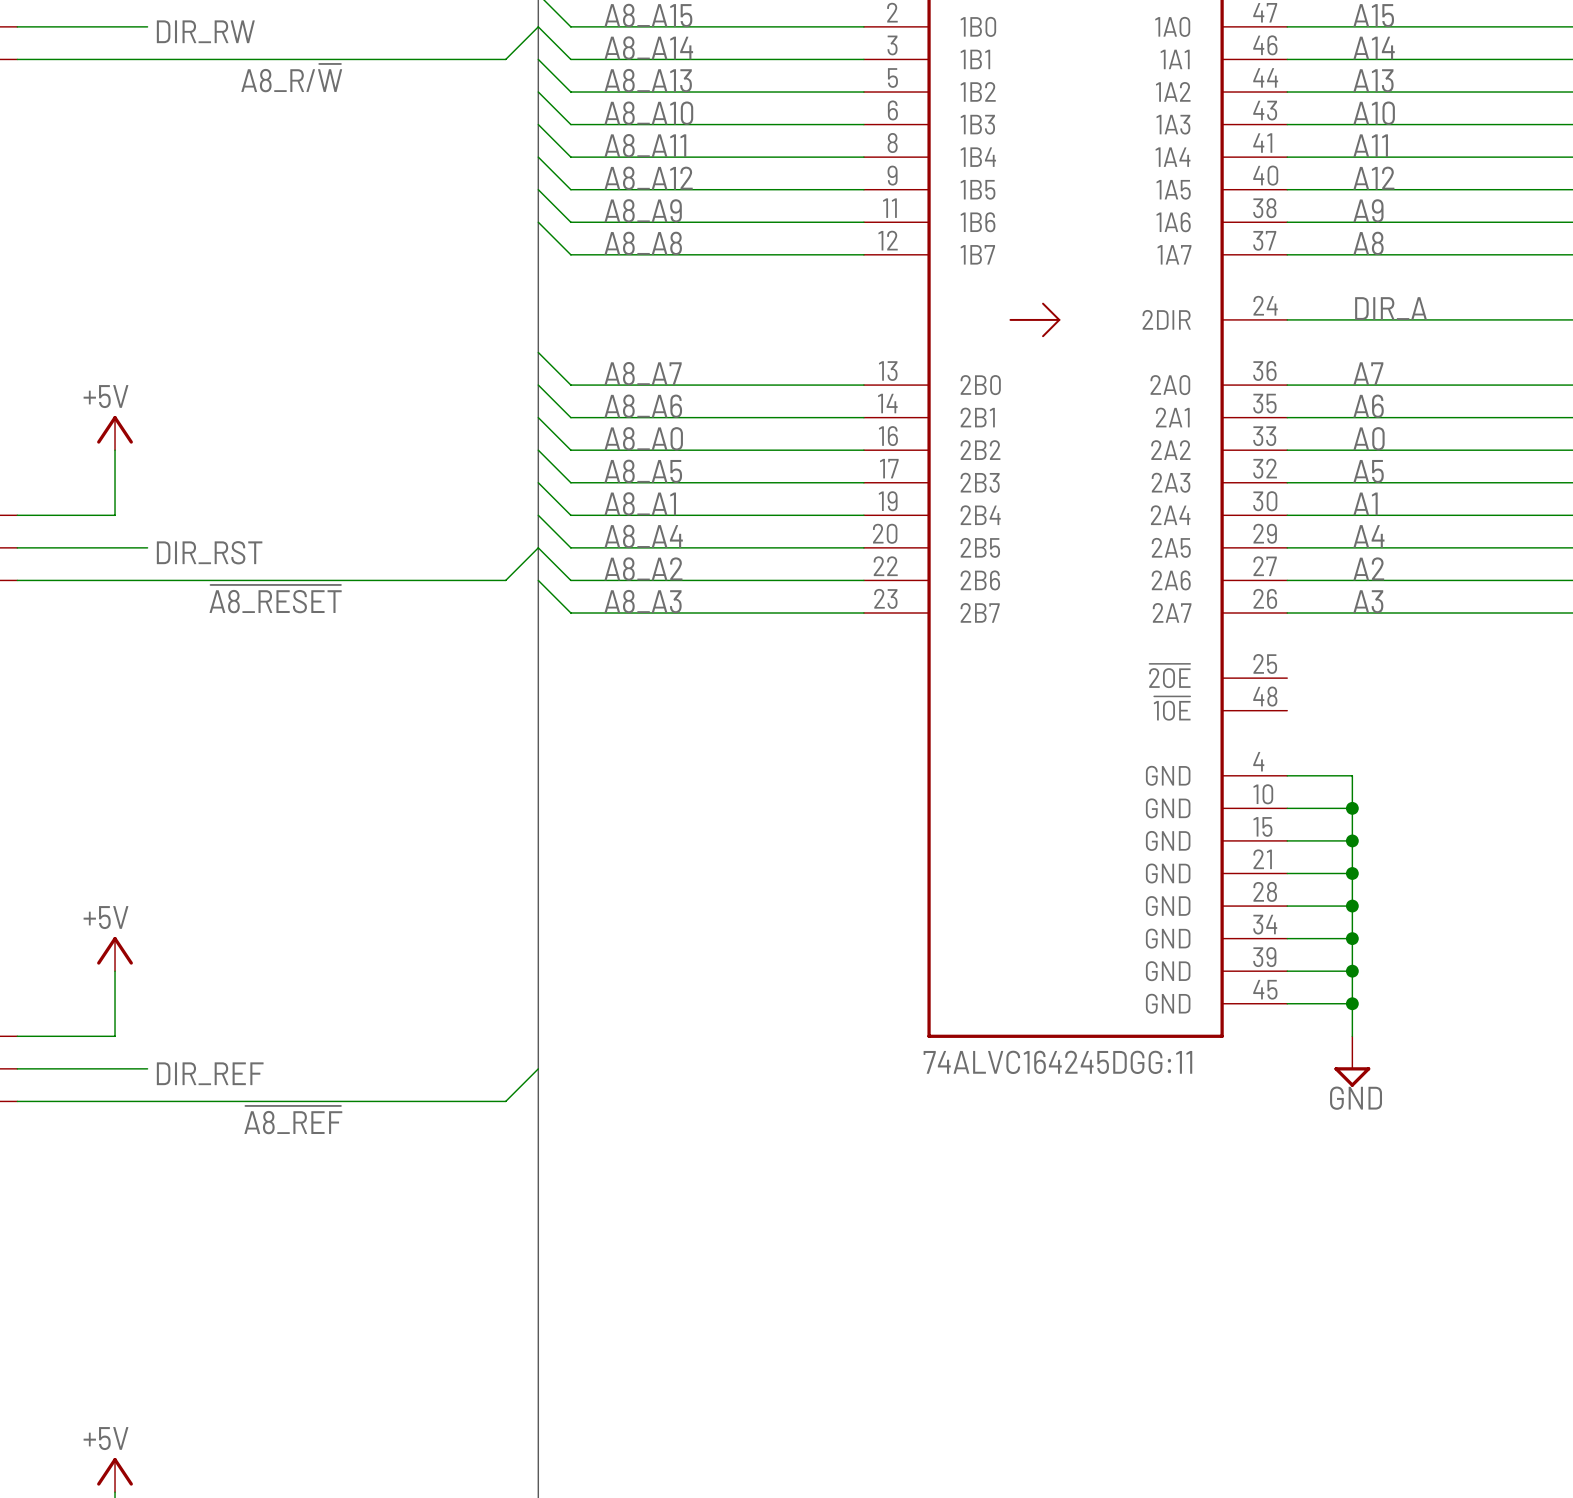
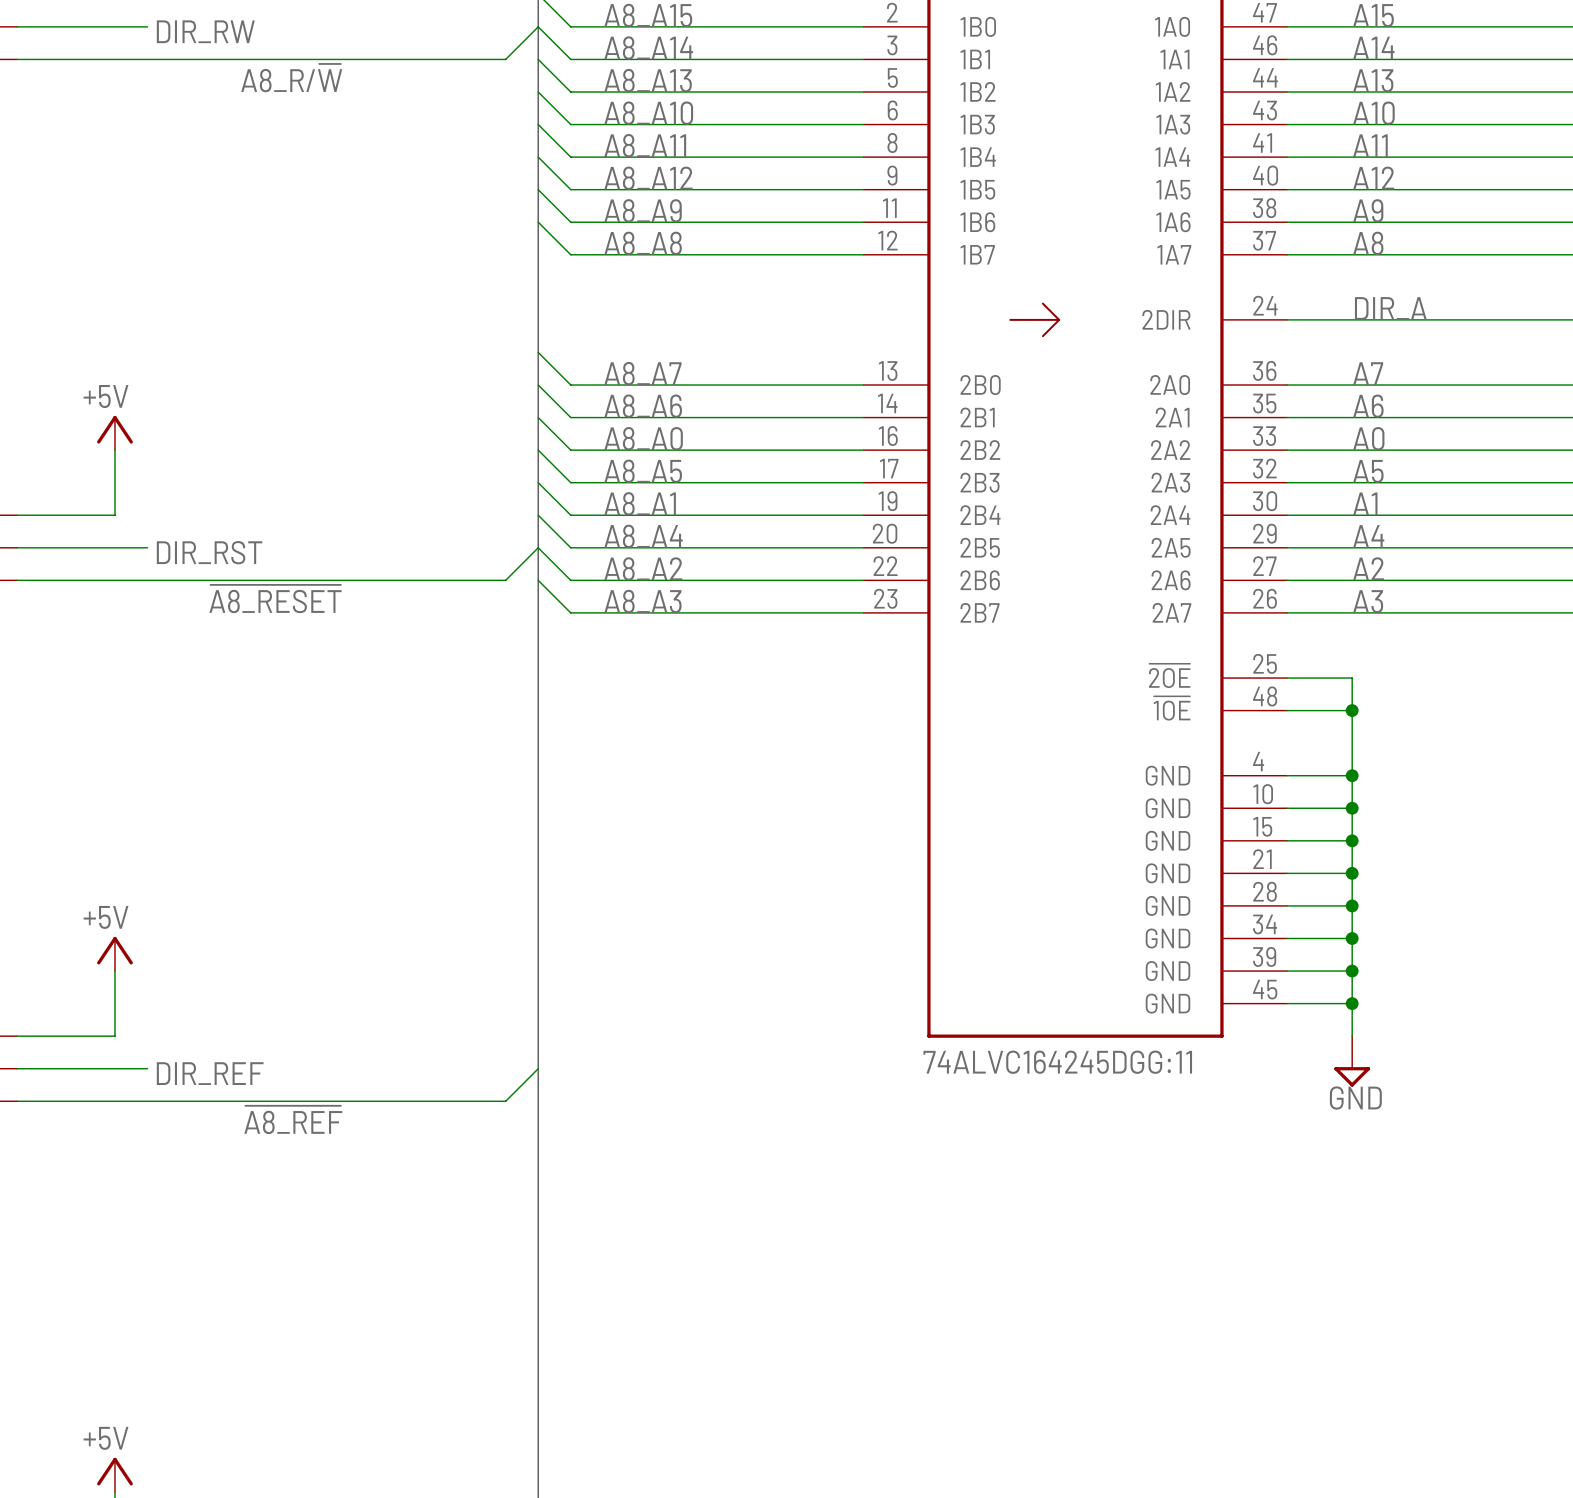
wire: none -> (1287, 678) (1352, 678) (1352, 775)
wire: none -> (1287, 710) (1352, 710)
junction: none -> (1352, 710)
junction: none -> (1352, 775)

